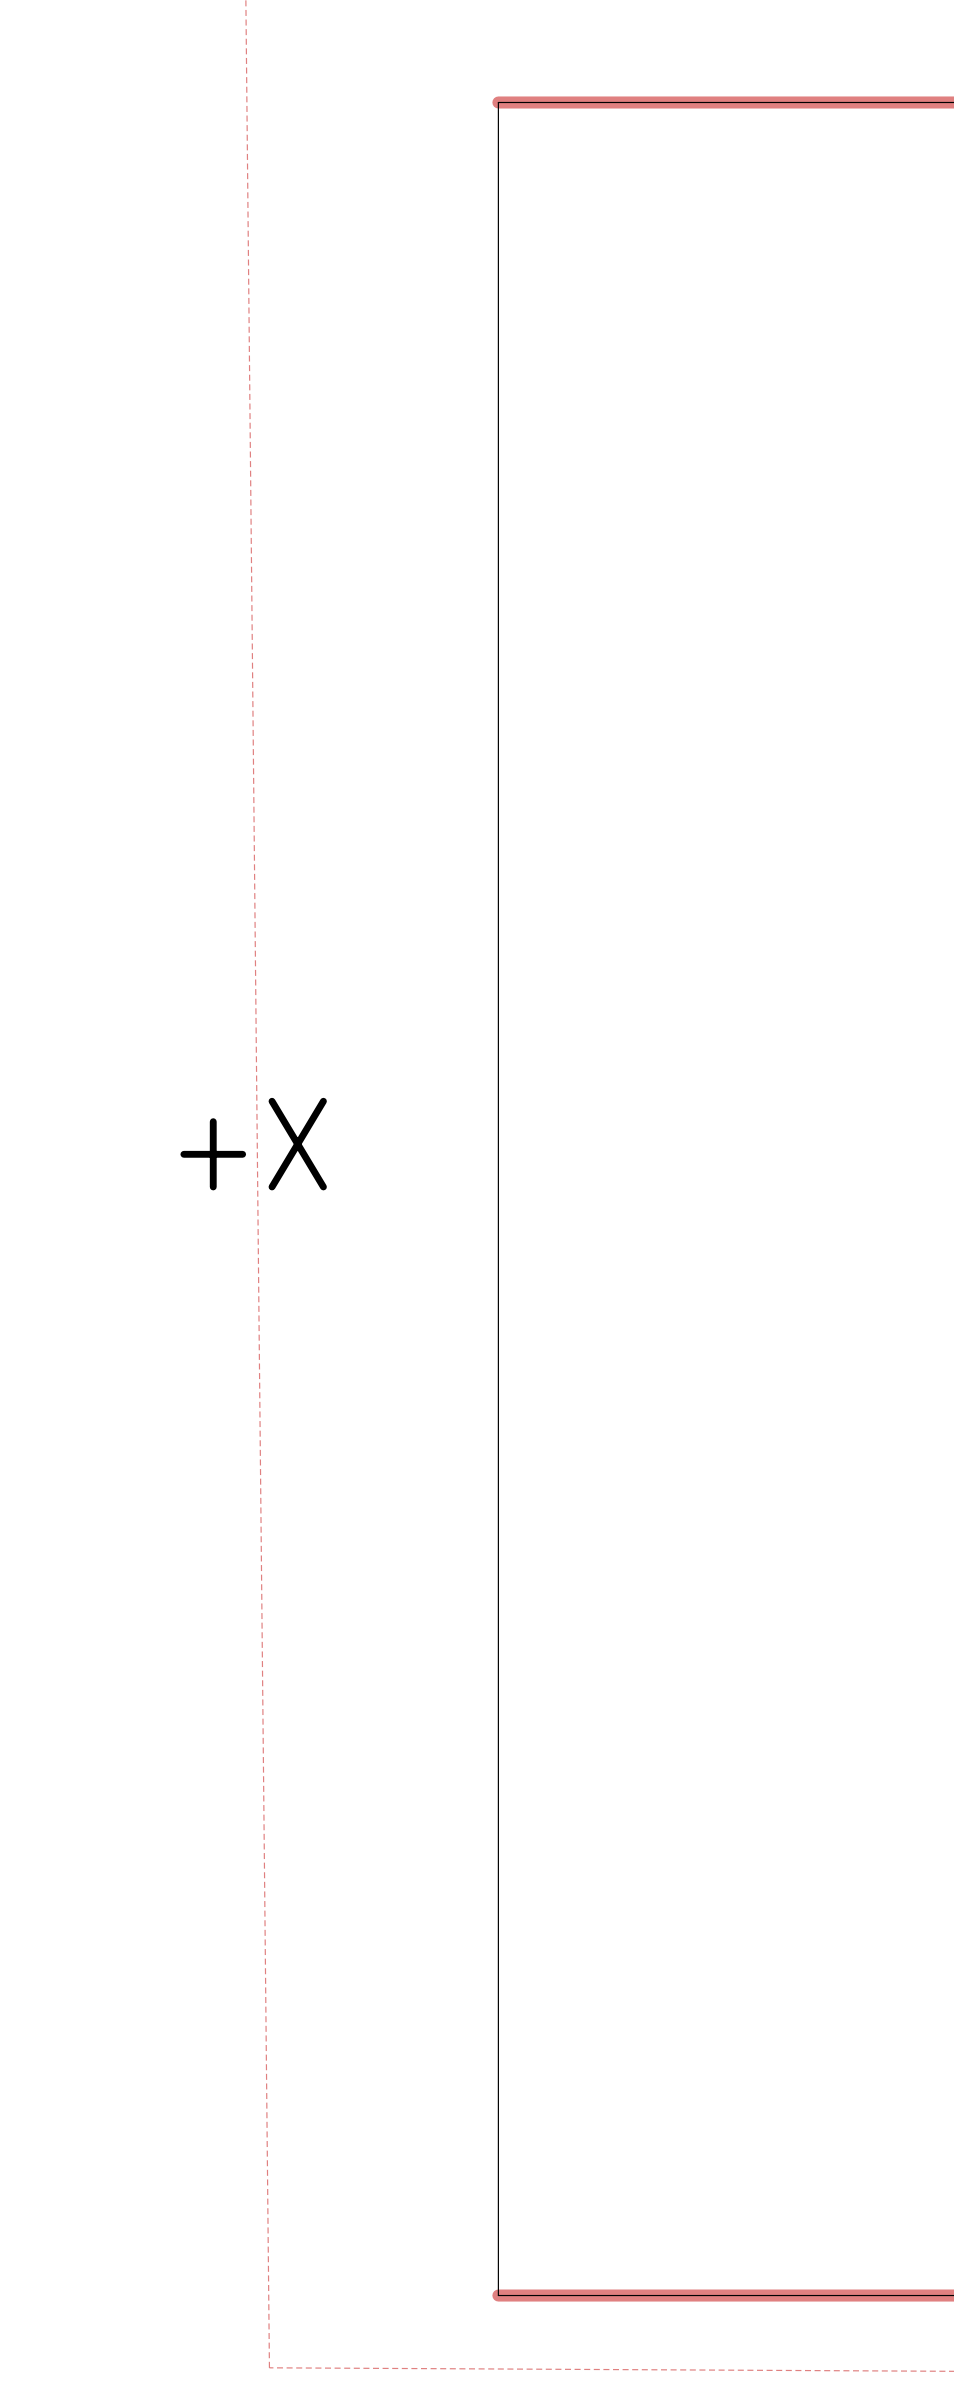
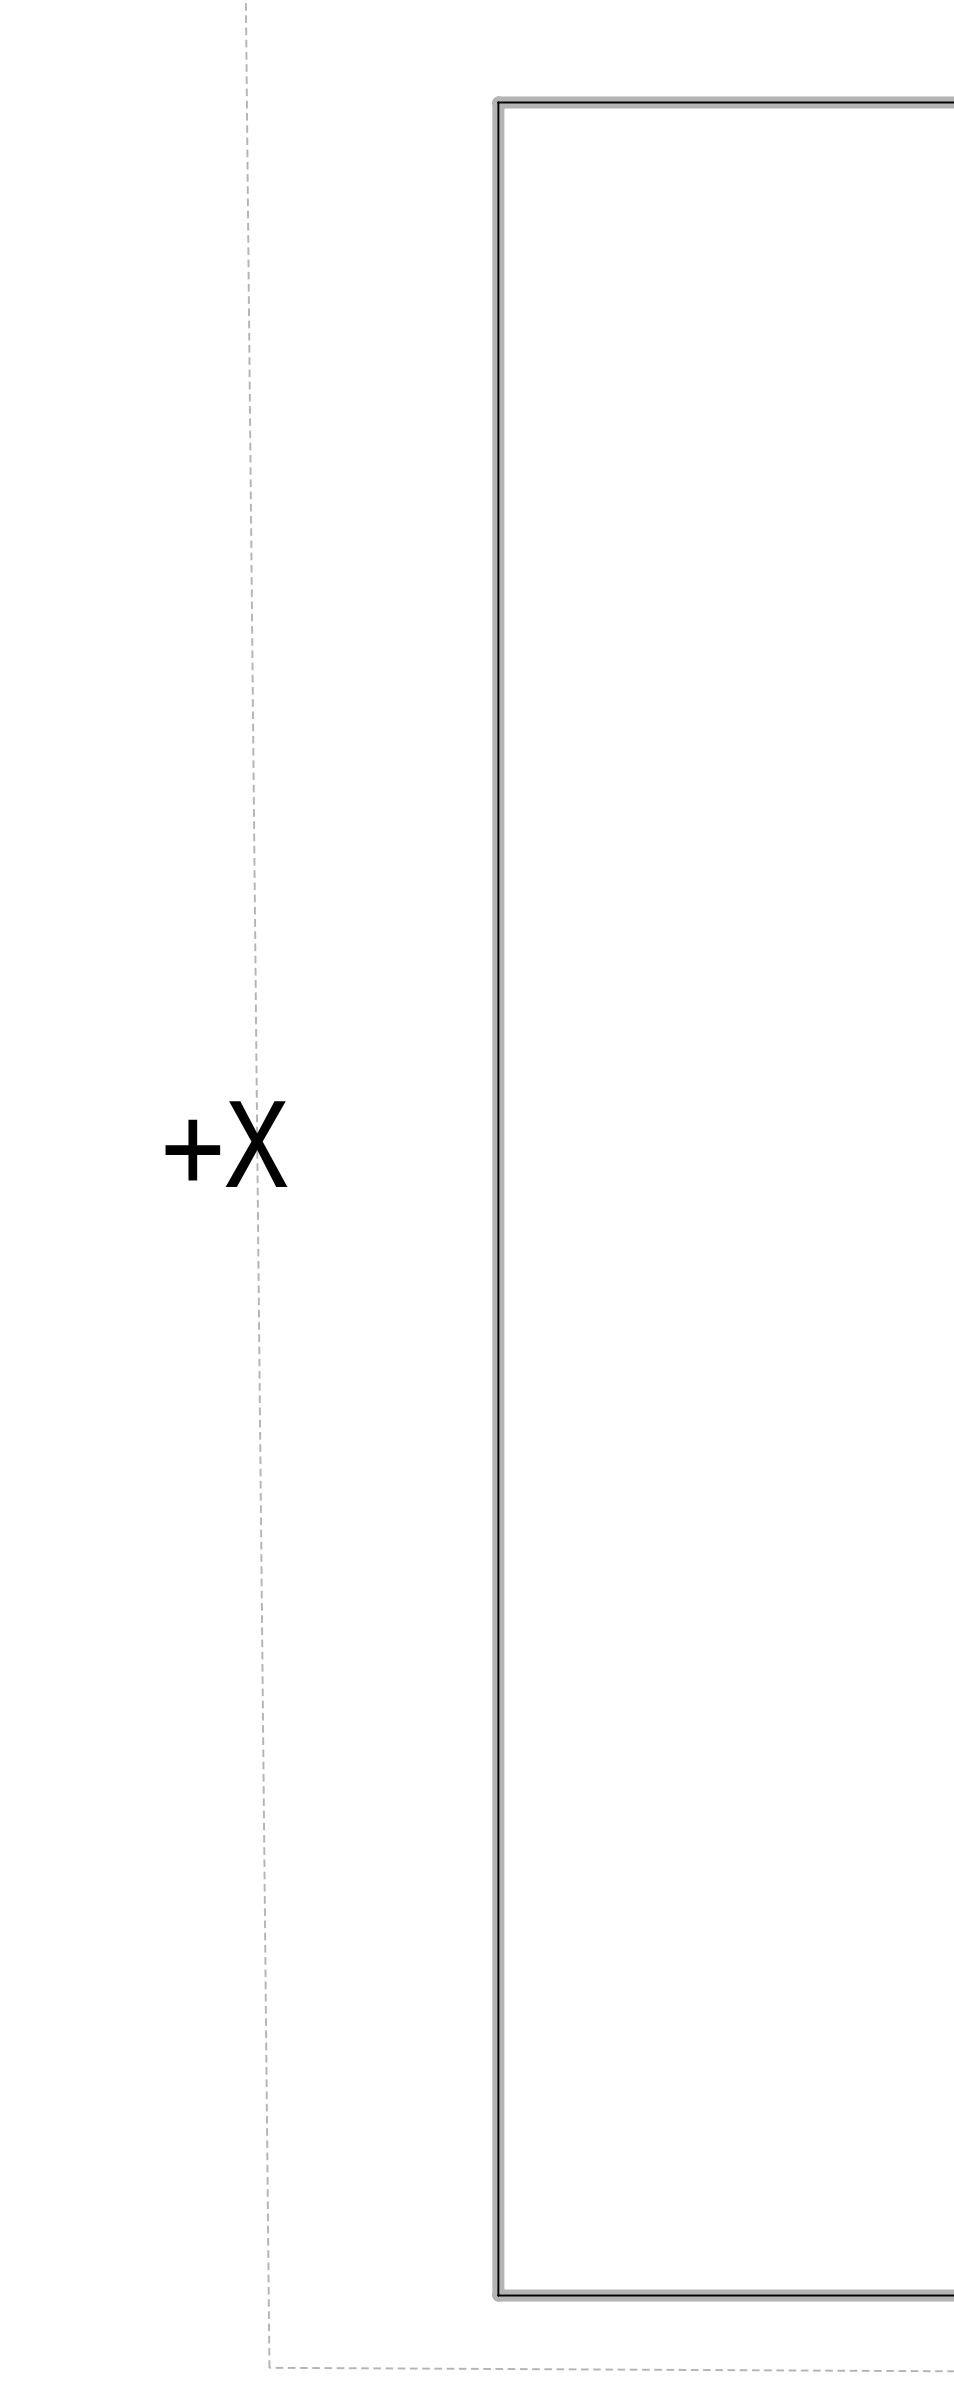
track: none -> (498, 102) (498, 2295)

